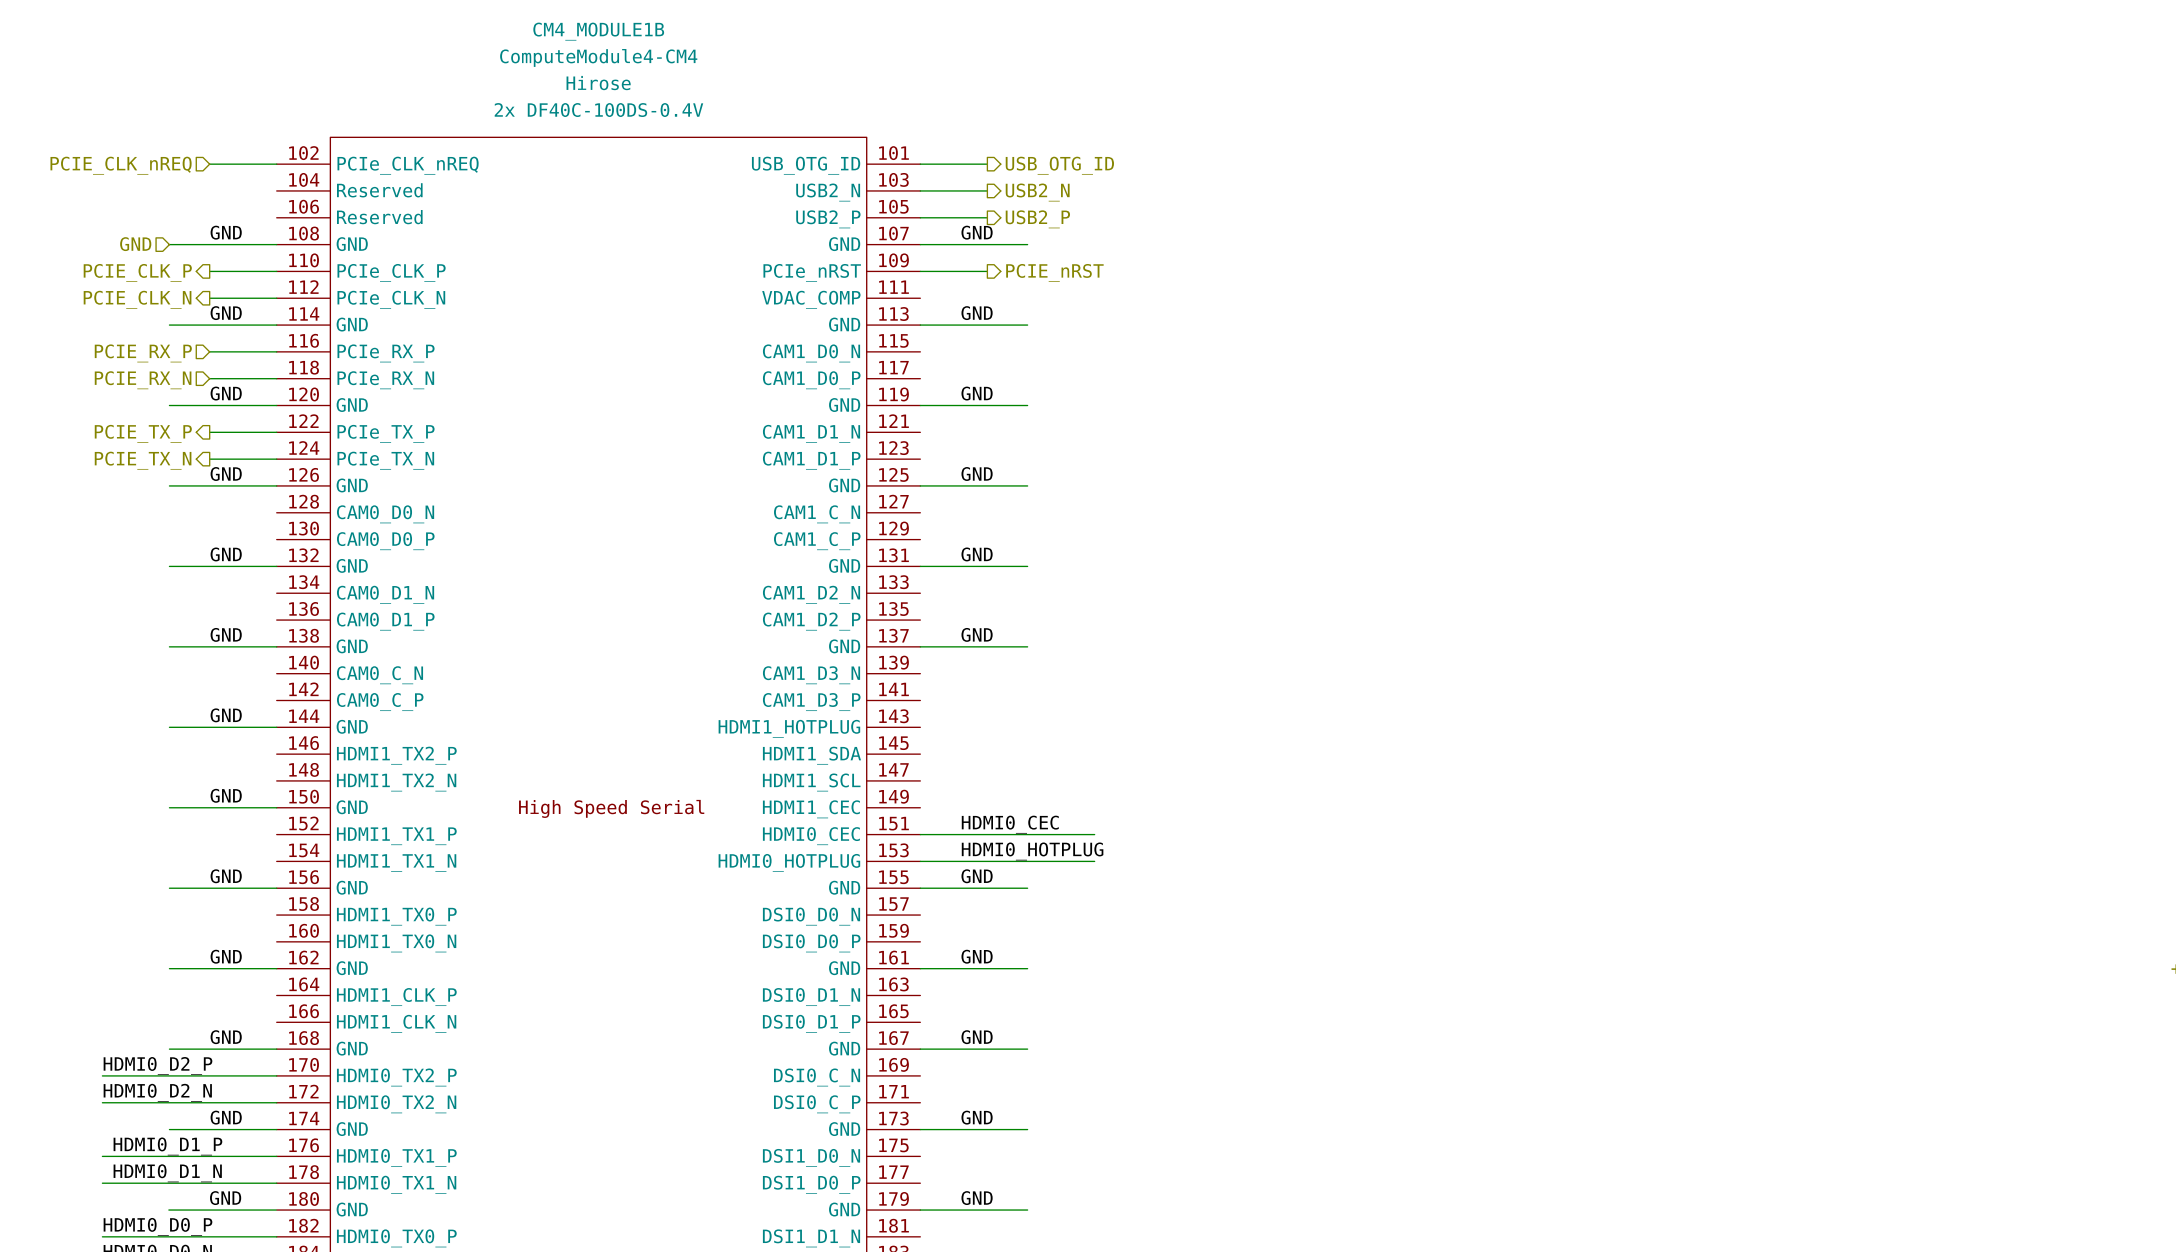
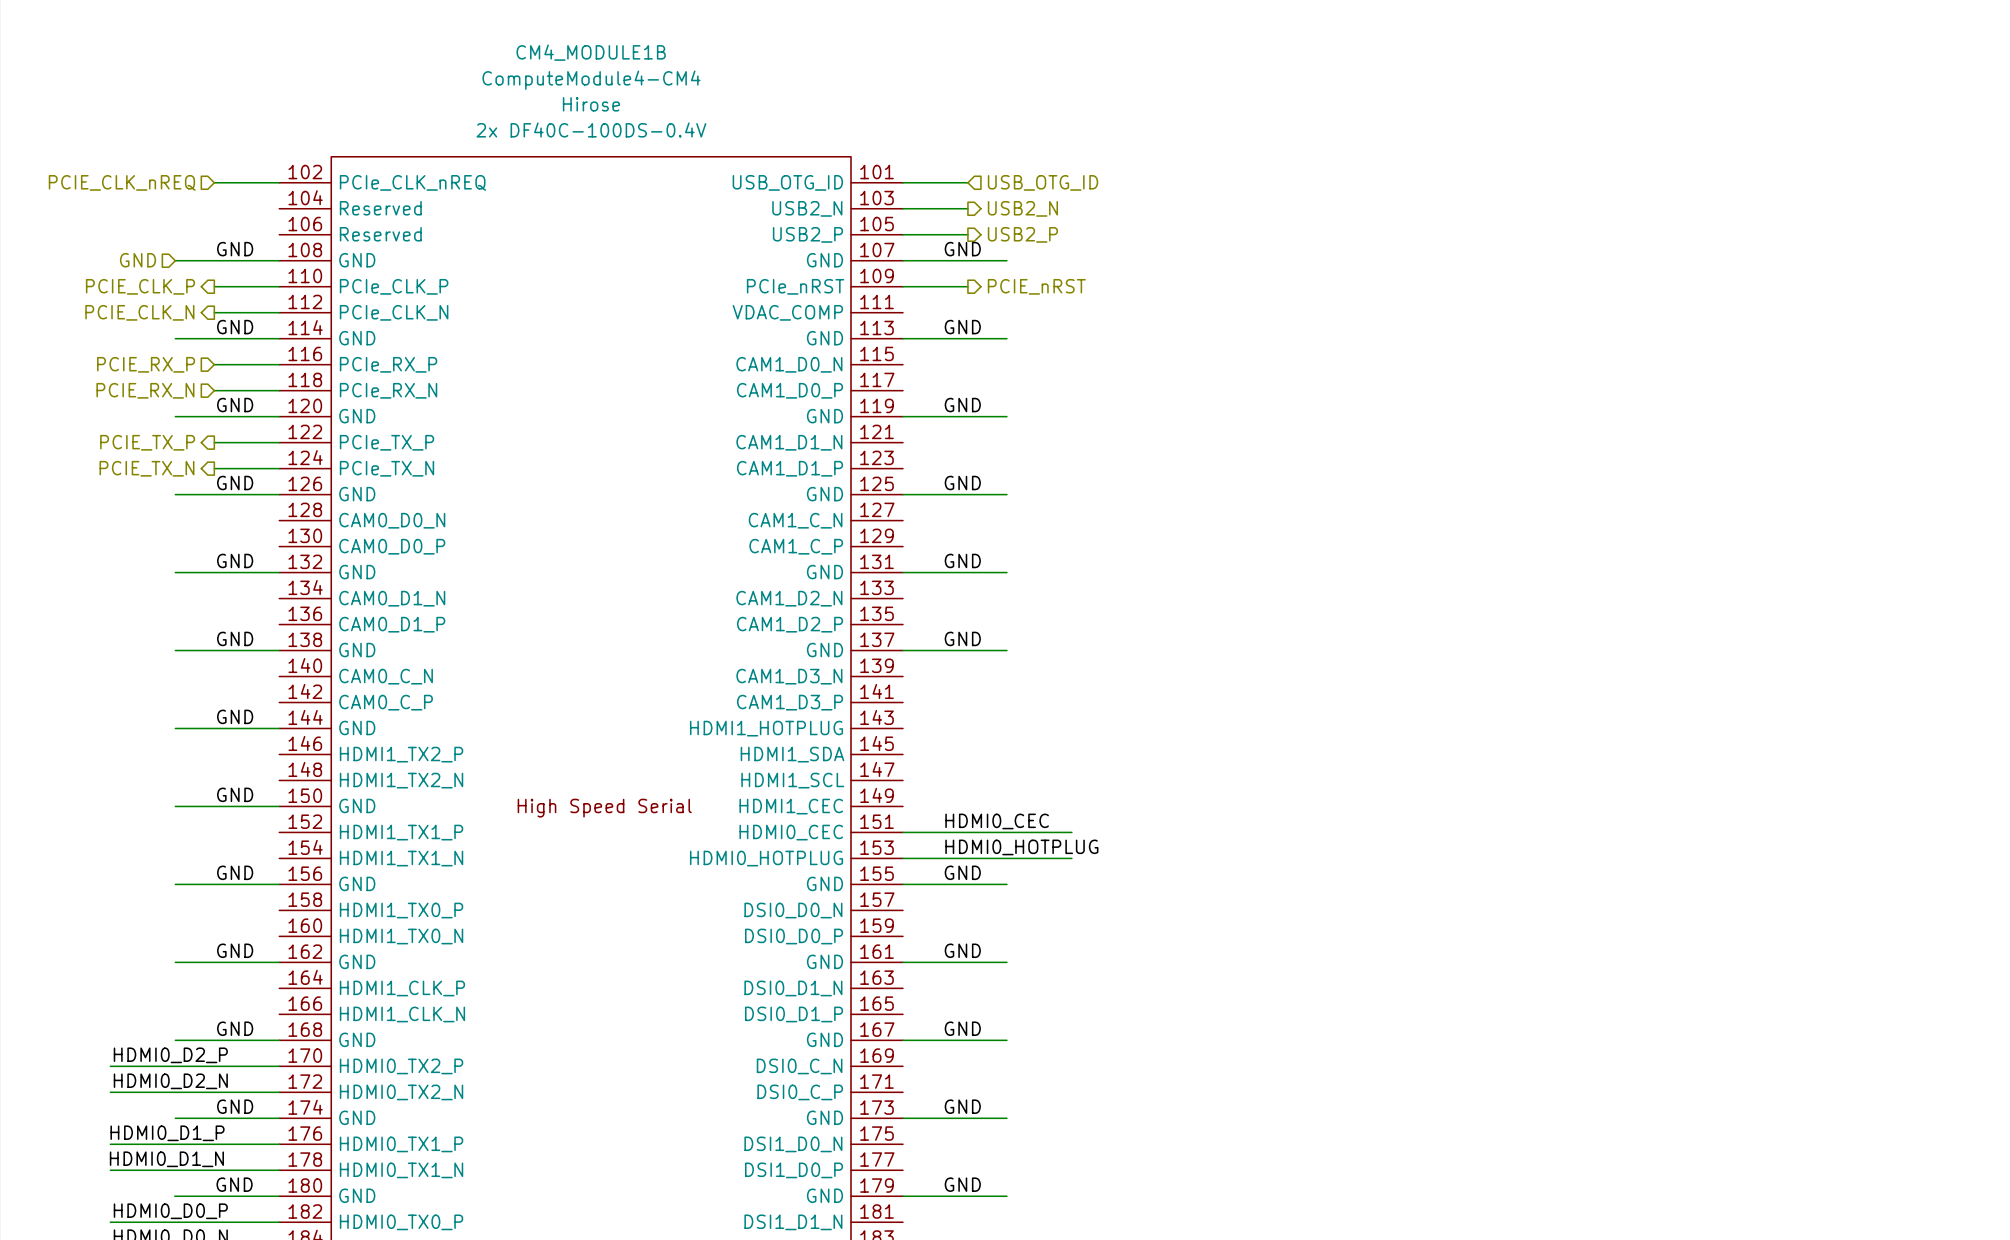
hierarchical label shape: output (1059, 165) -> input (1043, 182)

